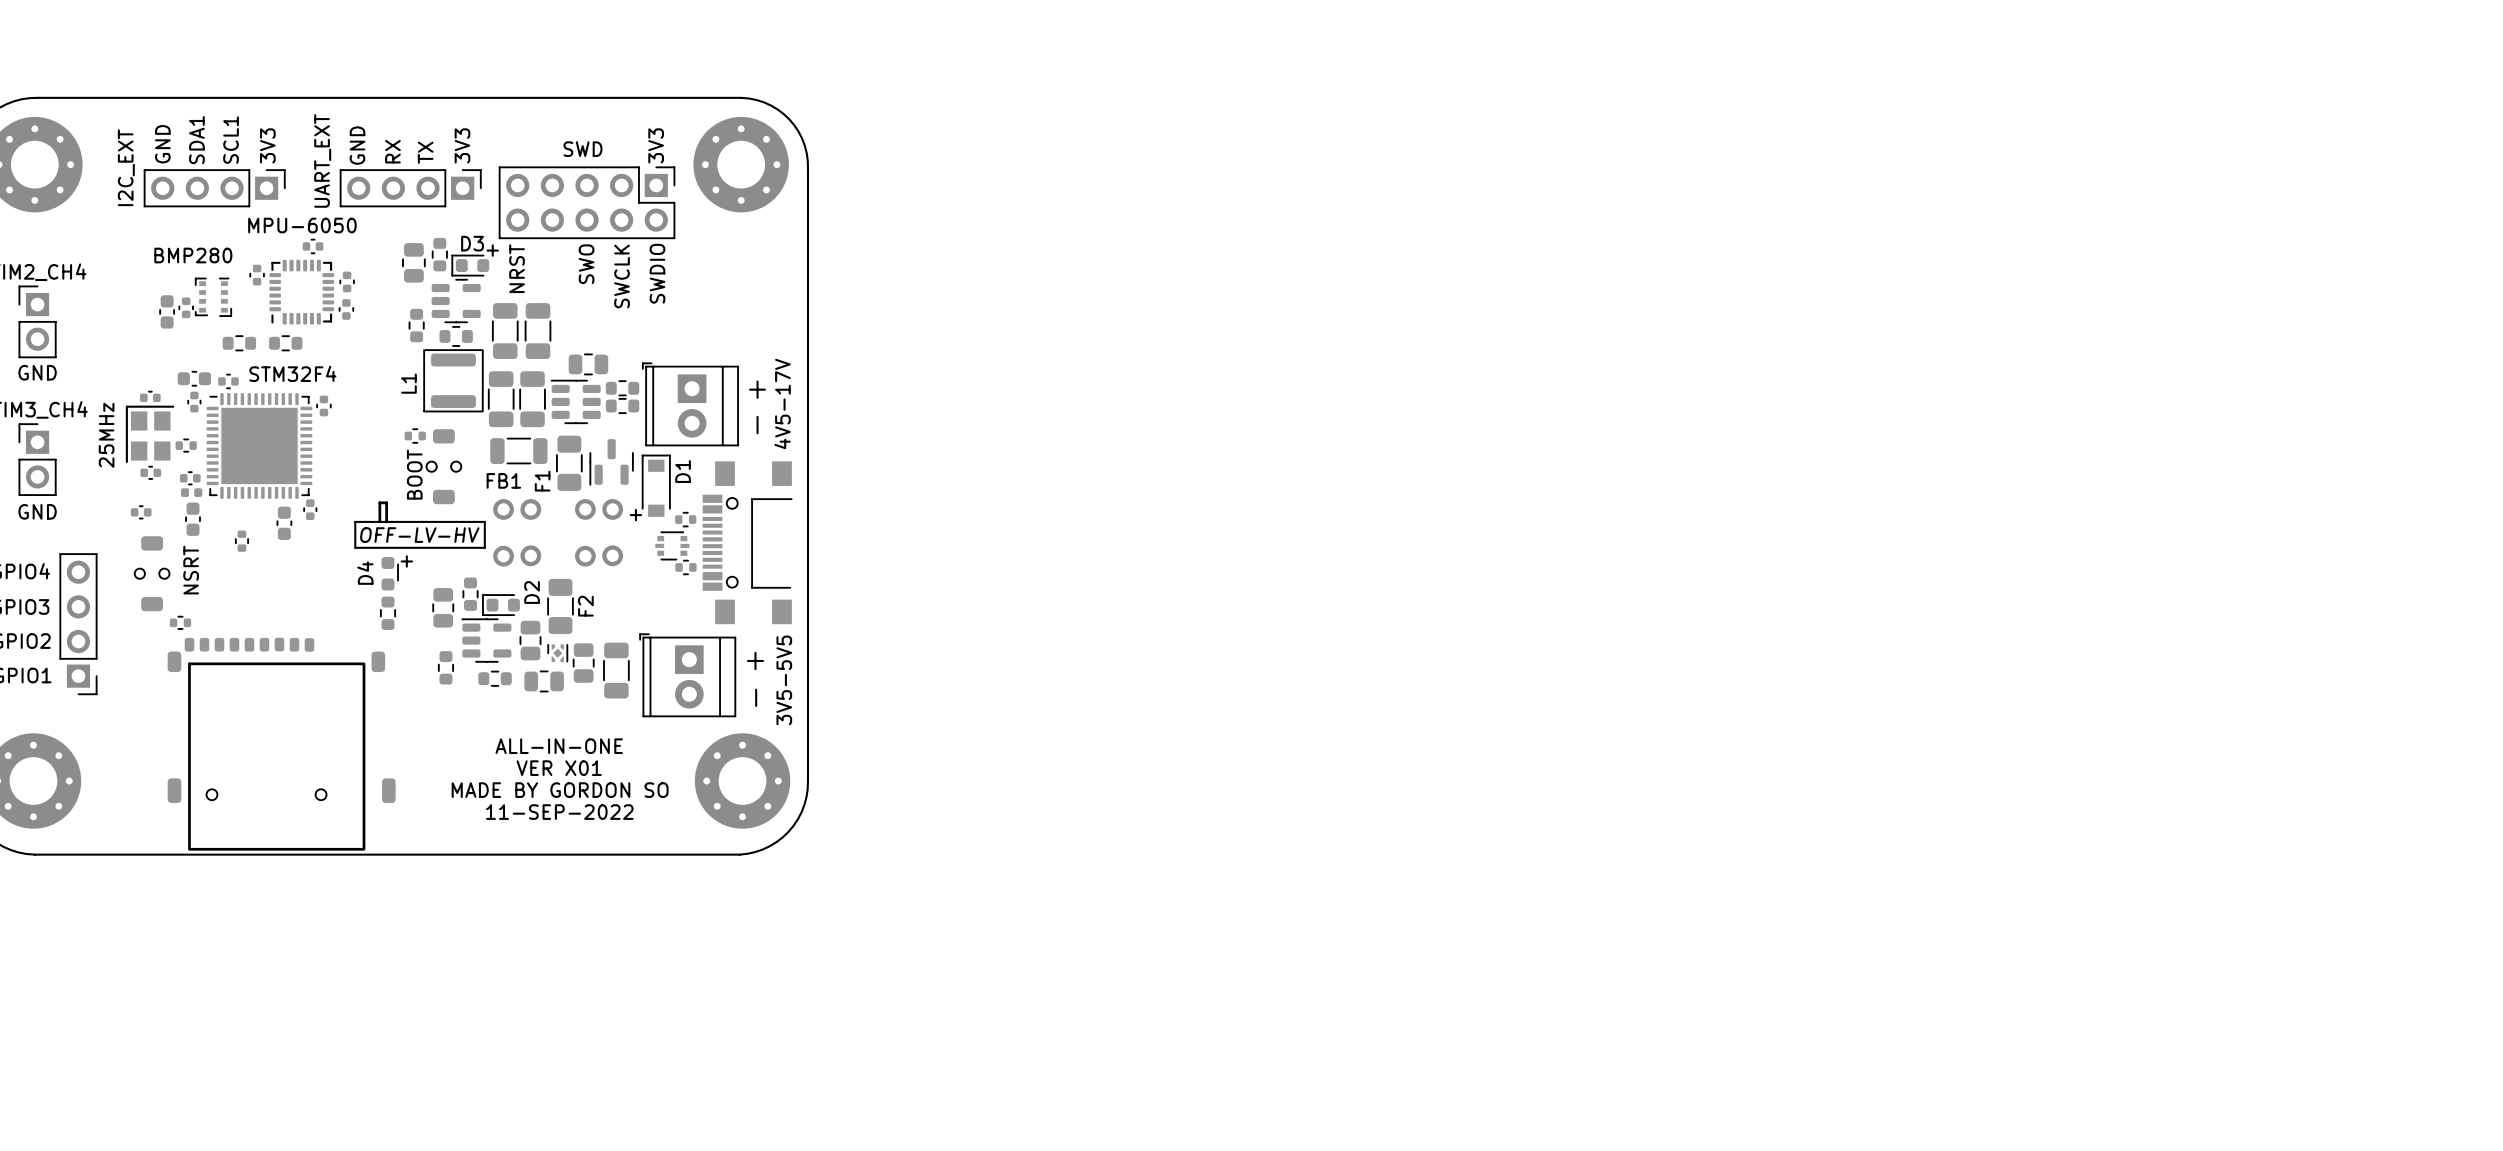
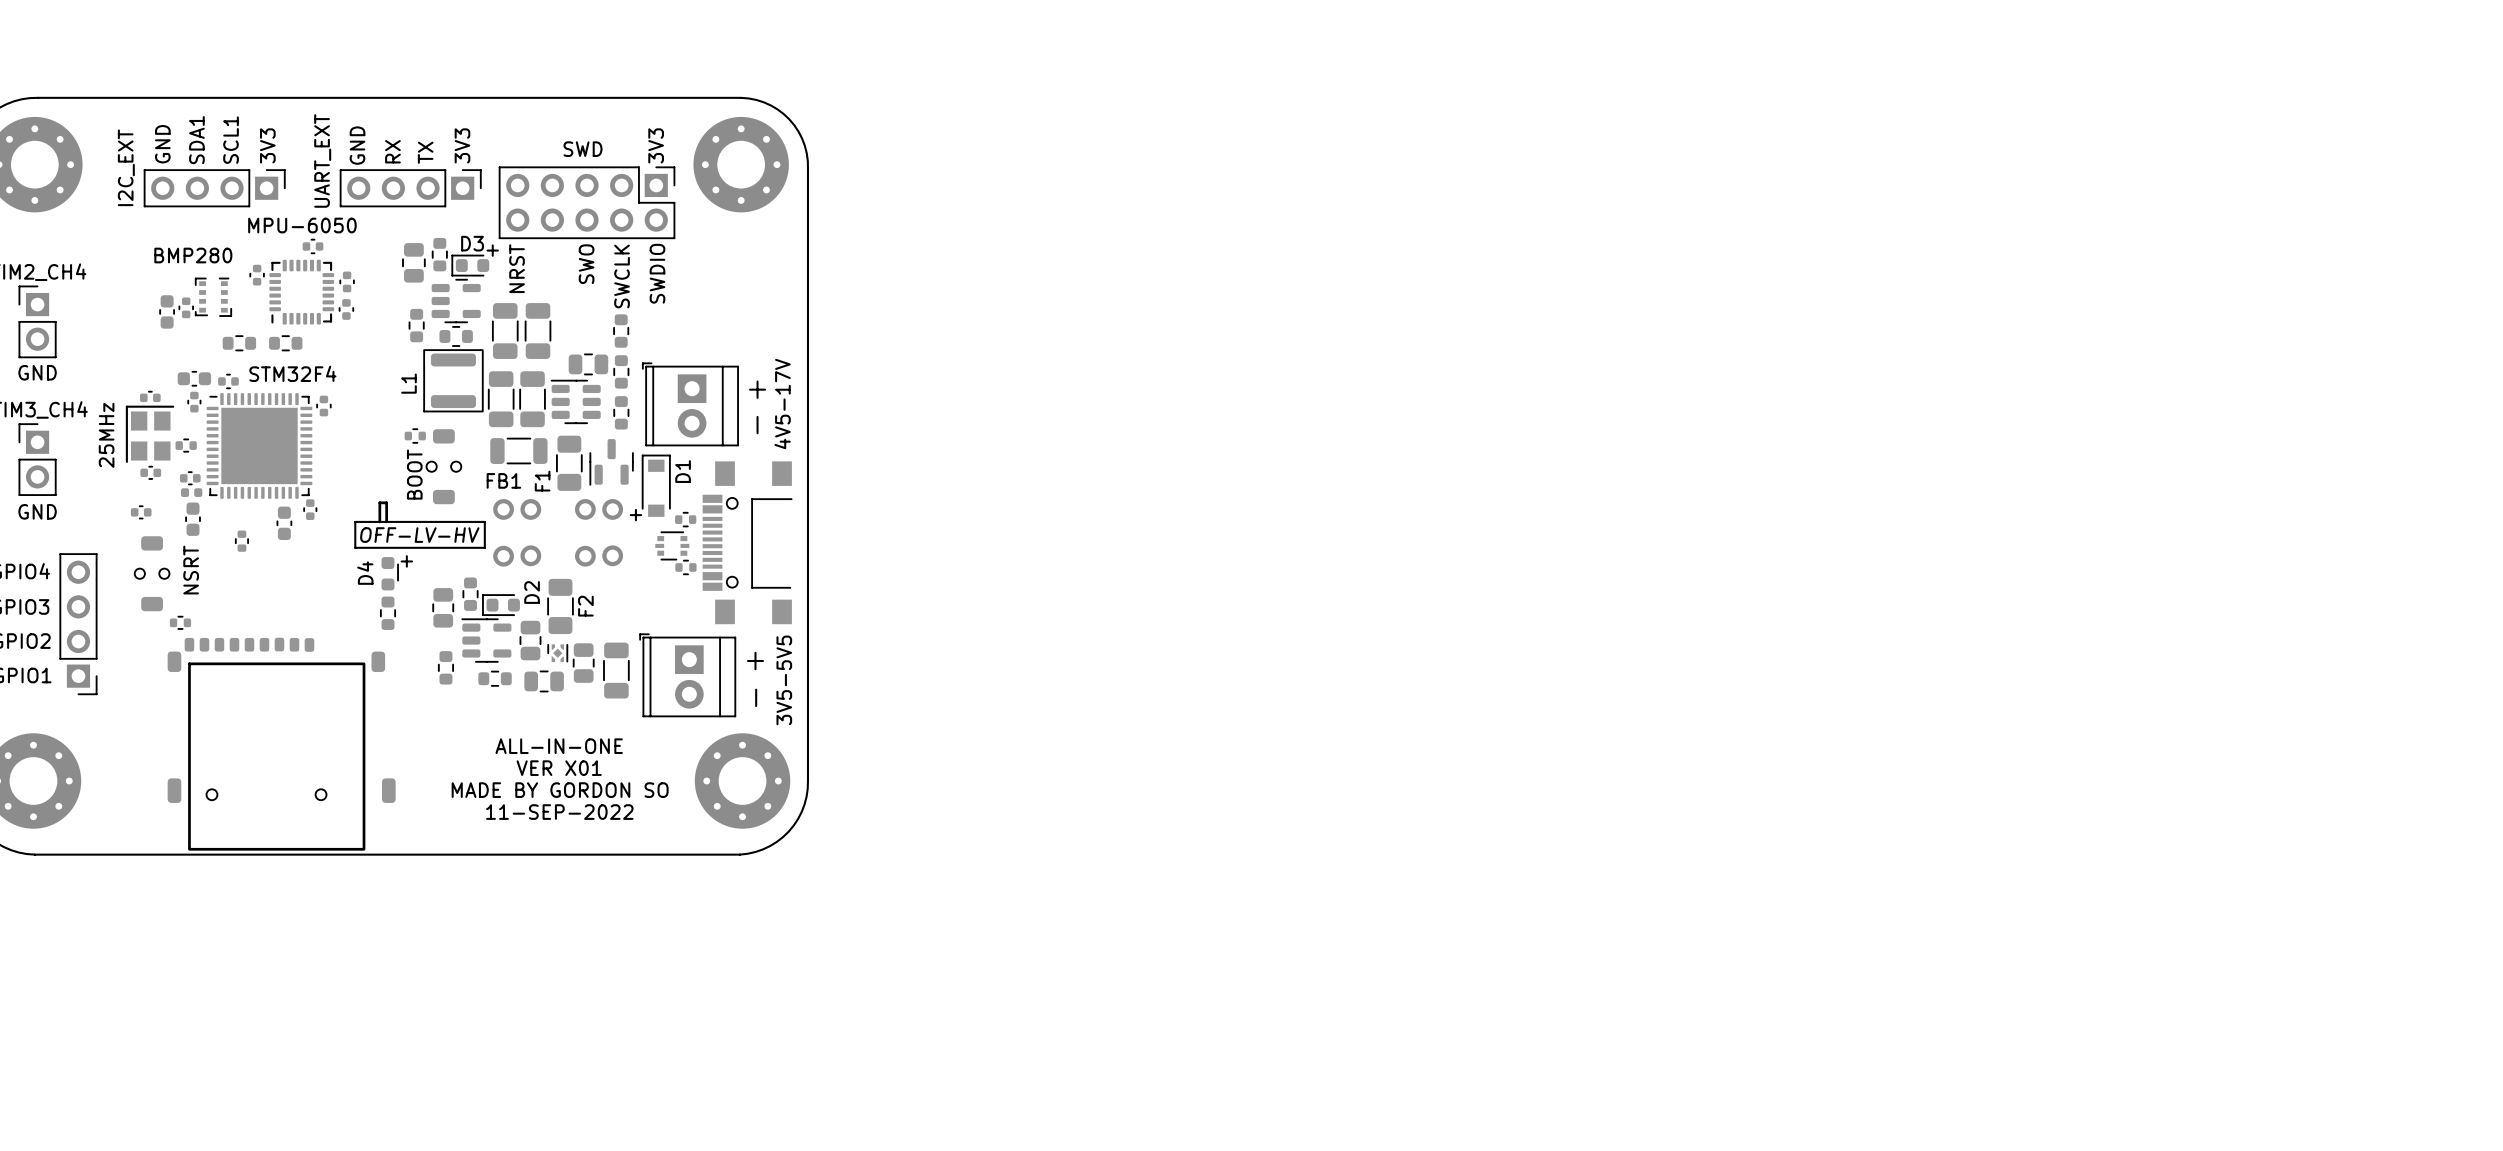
part: none -> (621, 331)
part rotation: 0° (622, 388) -> 90° clockwise (621, 371)
part rotation: 0° (622, 406) -> 90° clockwise (621, 412)

